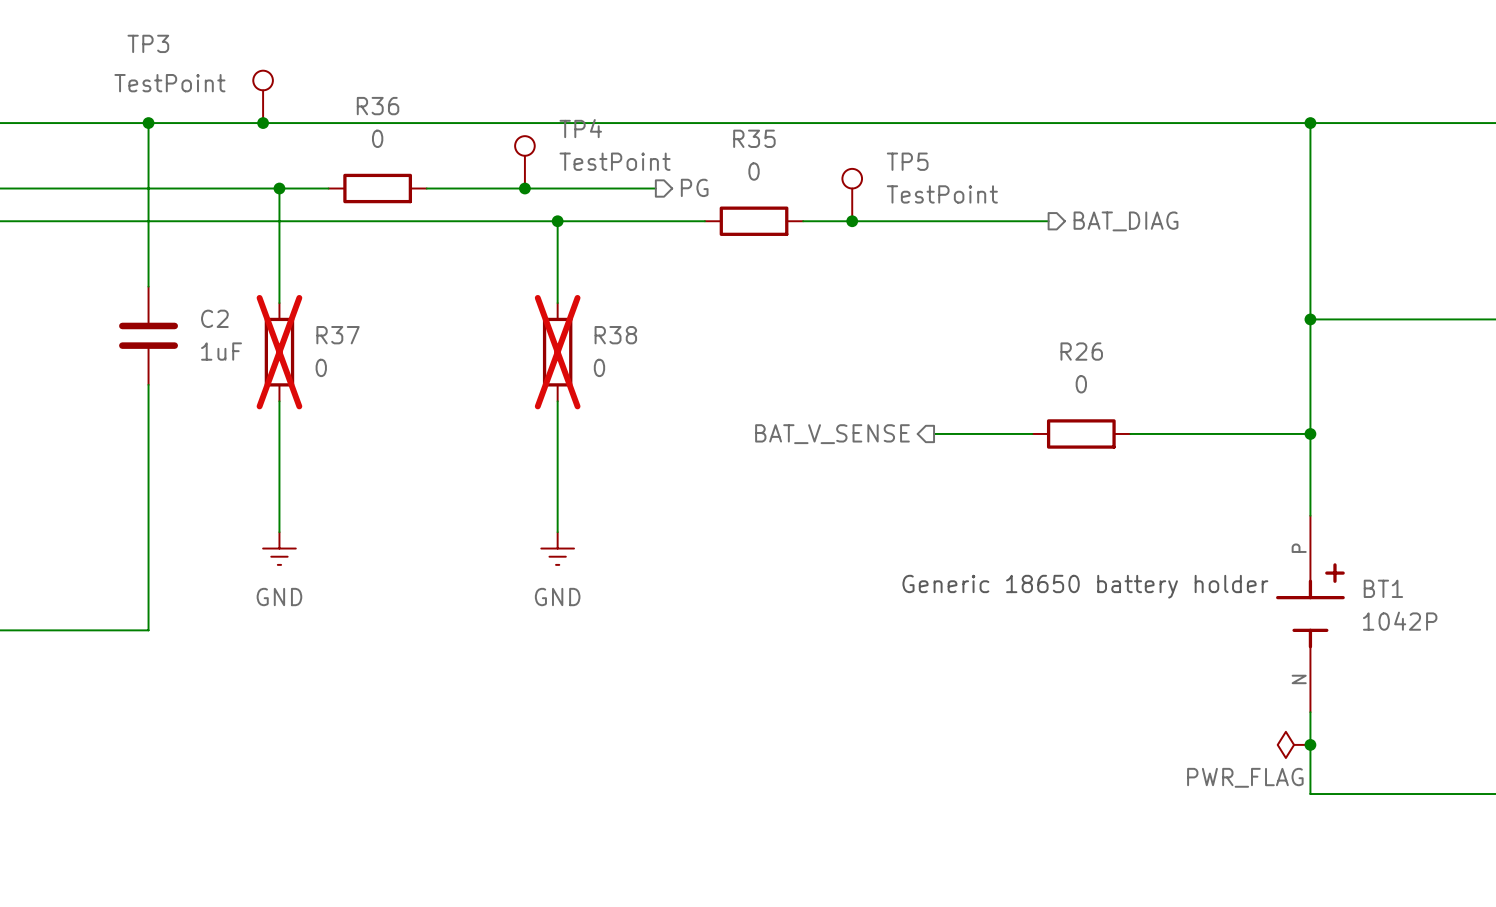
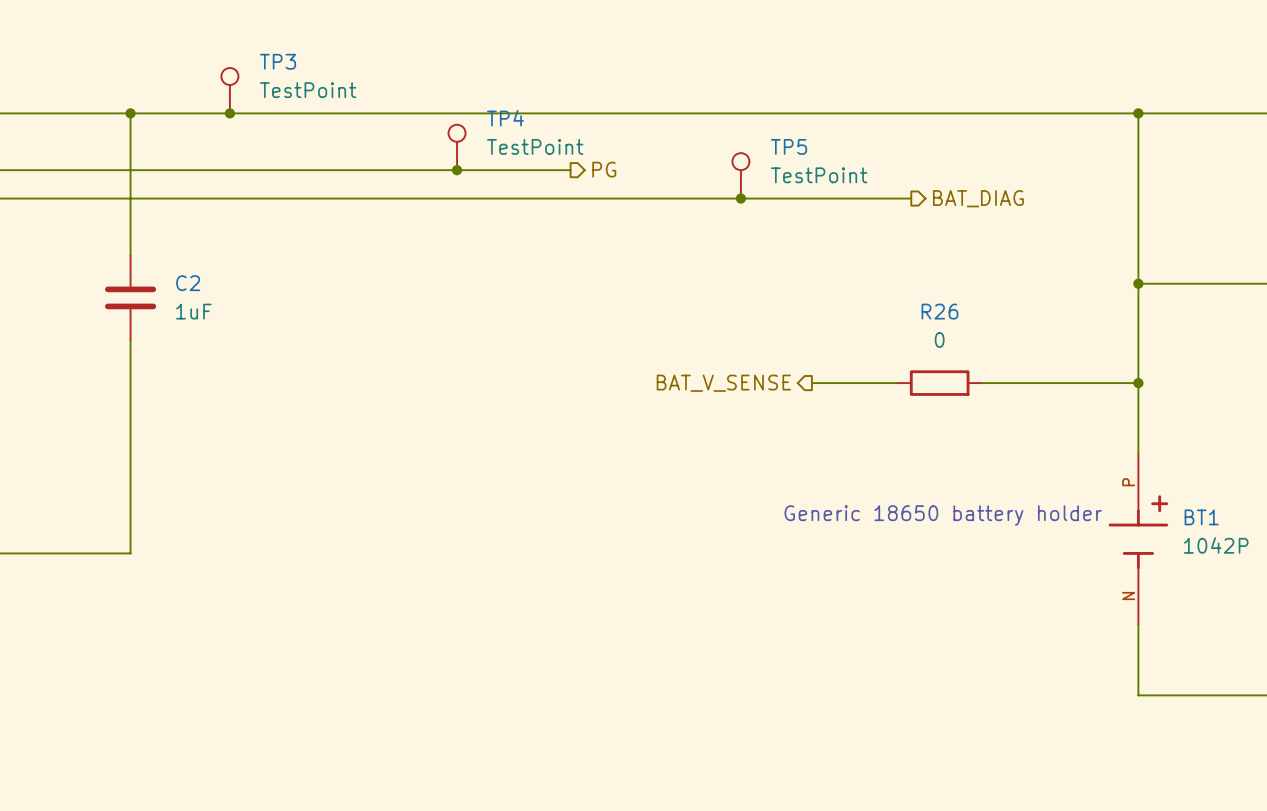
TP3 name position: TP3 (148, 43) -> TP3 (278, 61)
TP3 value position: TestPoint (169, 83) -> TestPoint (308, 90)
wire: (279, 188) (279, 303) -> none
junction: (279, 188) -> none
wire: none -> (286, 170) (371, 170)
R36: 0 (377, 188) -> none
wire: (557, 221) (557, 303) -> none
junction: (557, 221) -> none
wire: none -> (613, 198) (698, 198)
R35: 0 (754, 221) -> none
R37: 0 (279, 352) -> none
R38: 0 (557, 352) -> none
wire: (279, 401) (279, 532) -> none
wire: (557, 401) (557, 532) -> none
power symbol: GND (279, 548) -> none
power symbol: GND (557, 548) -> none
power symbol: PWR_FLAG (1294, 744) -> none
junction: (1310, 744) -> none

